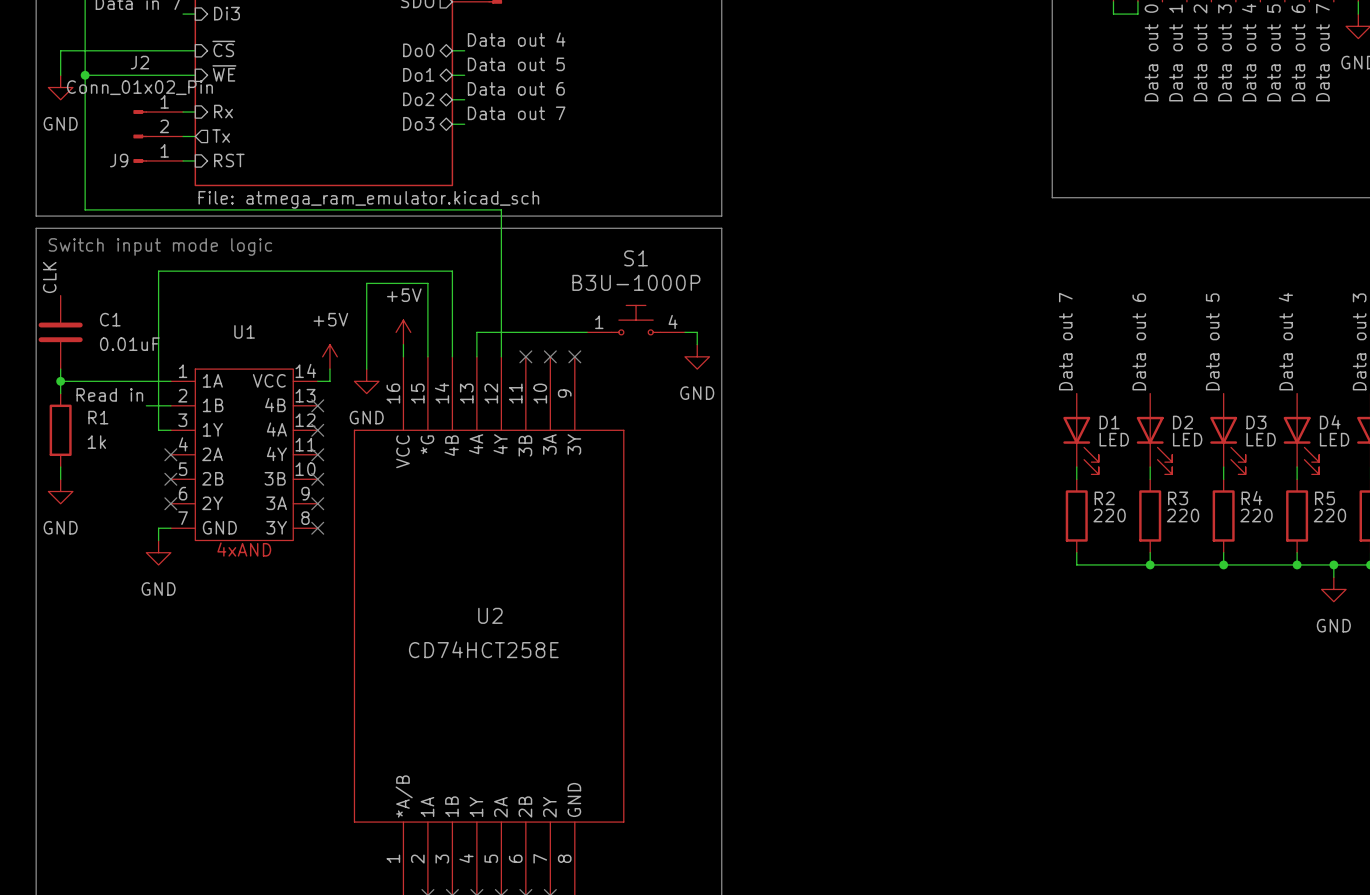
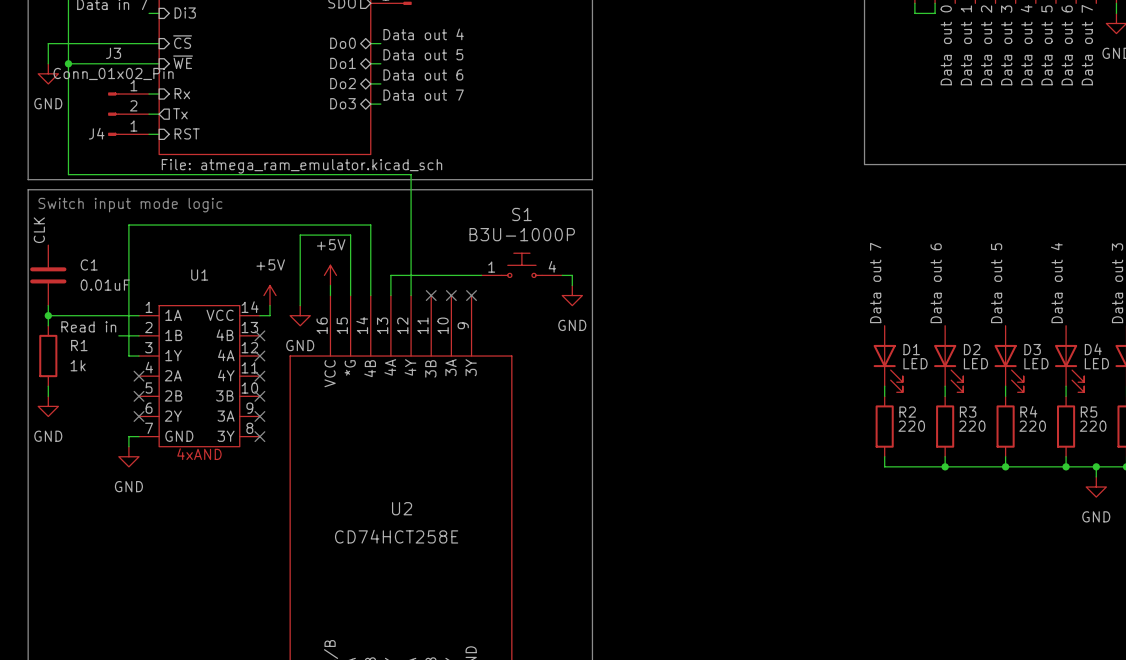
J2 name: J2 (139, 62) -> J3 (113, 53)
J9 name: J9 (119, 160) -> J4 (96, 133)

